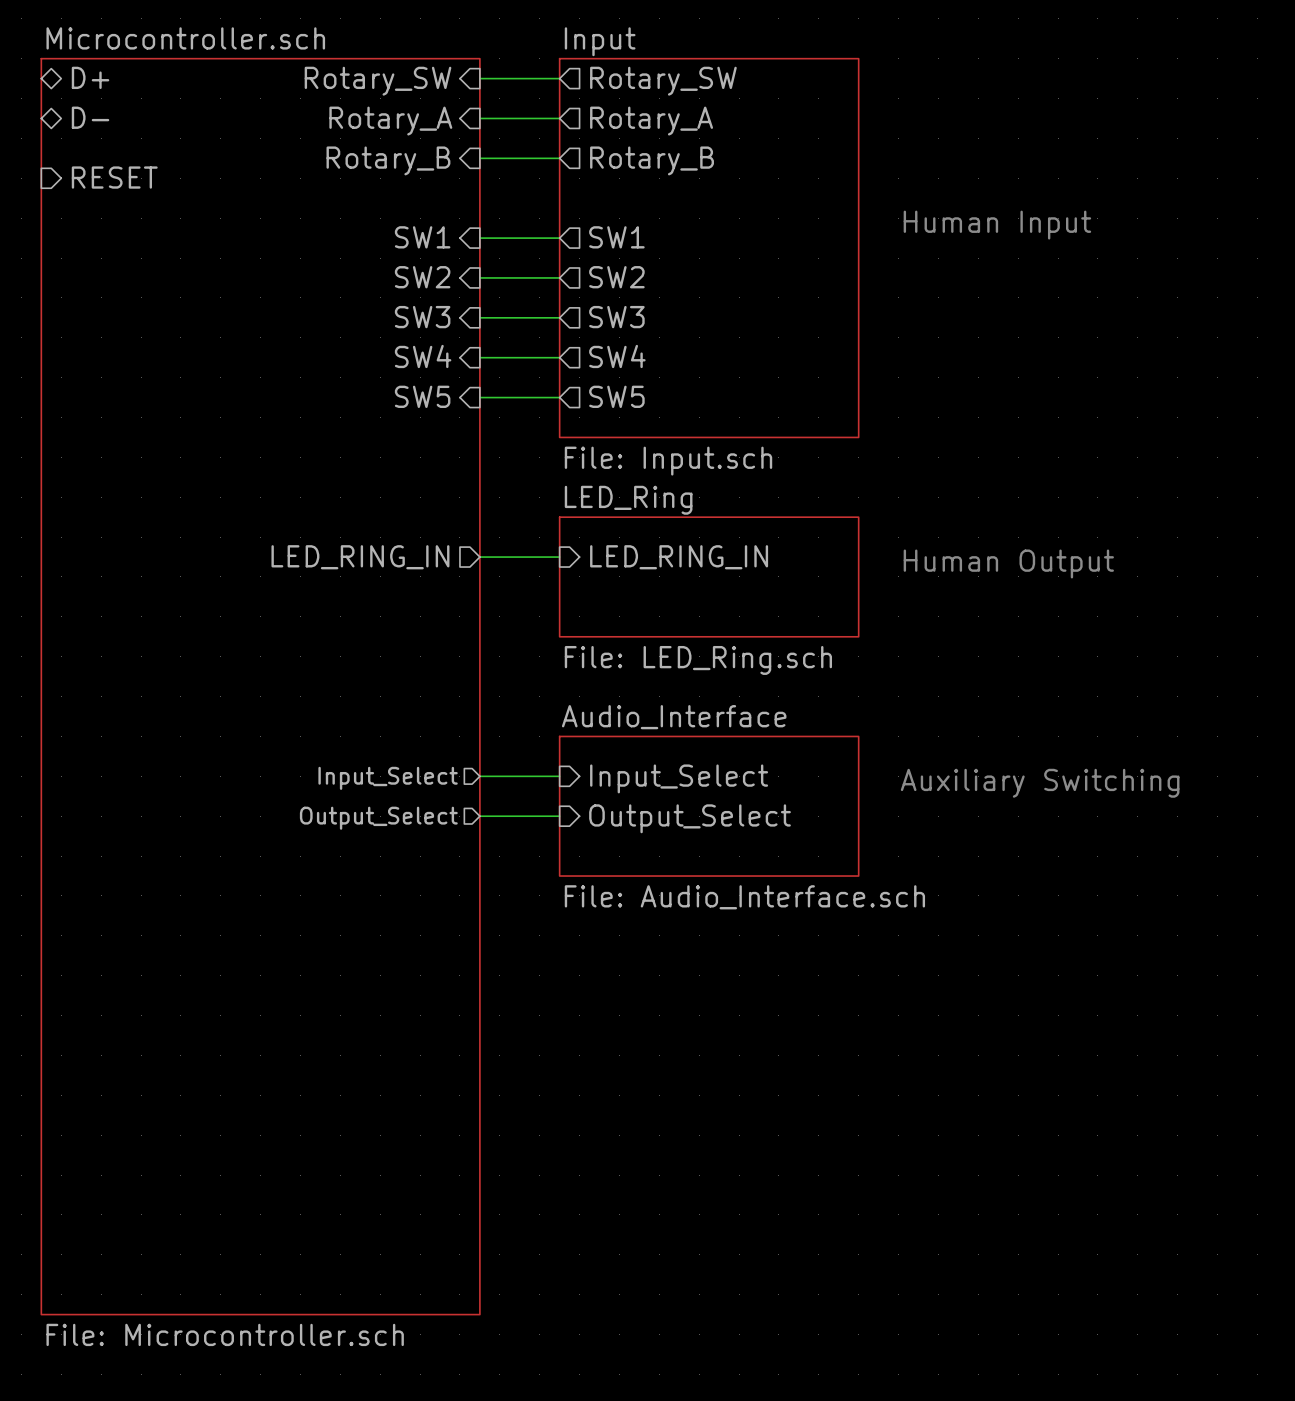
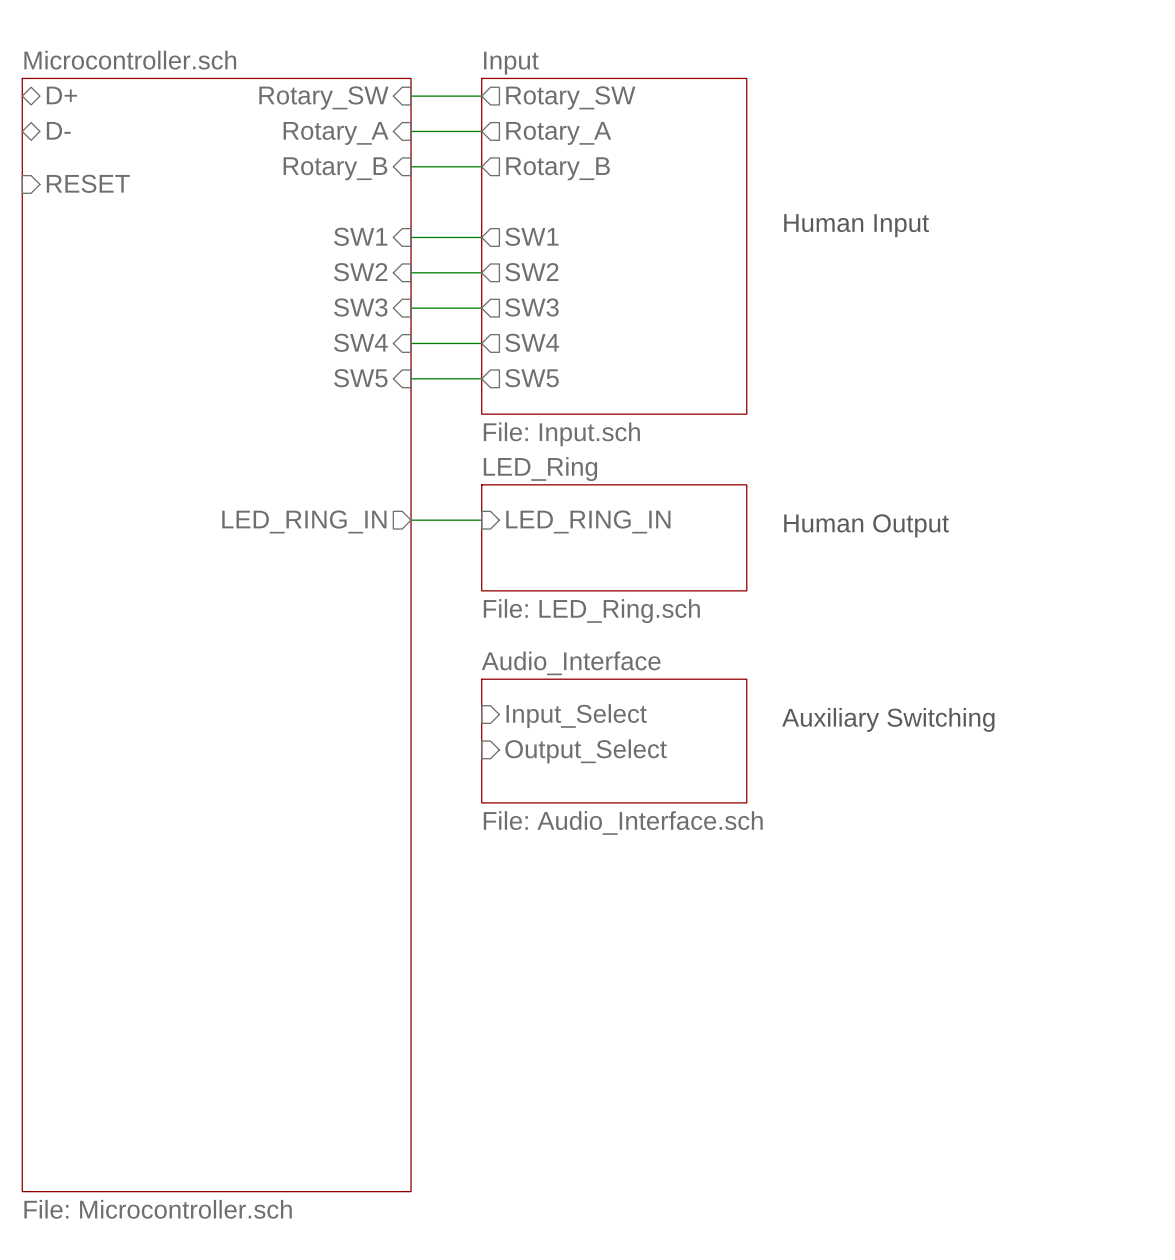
wire: (479, 776) (559, 776) -> none
sheet pin: Input_Select (388, 778) -> none
wire: (479, 816) (559, 816) -> none
sheet pin: Output_Select (378, 818) -> none

